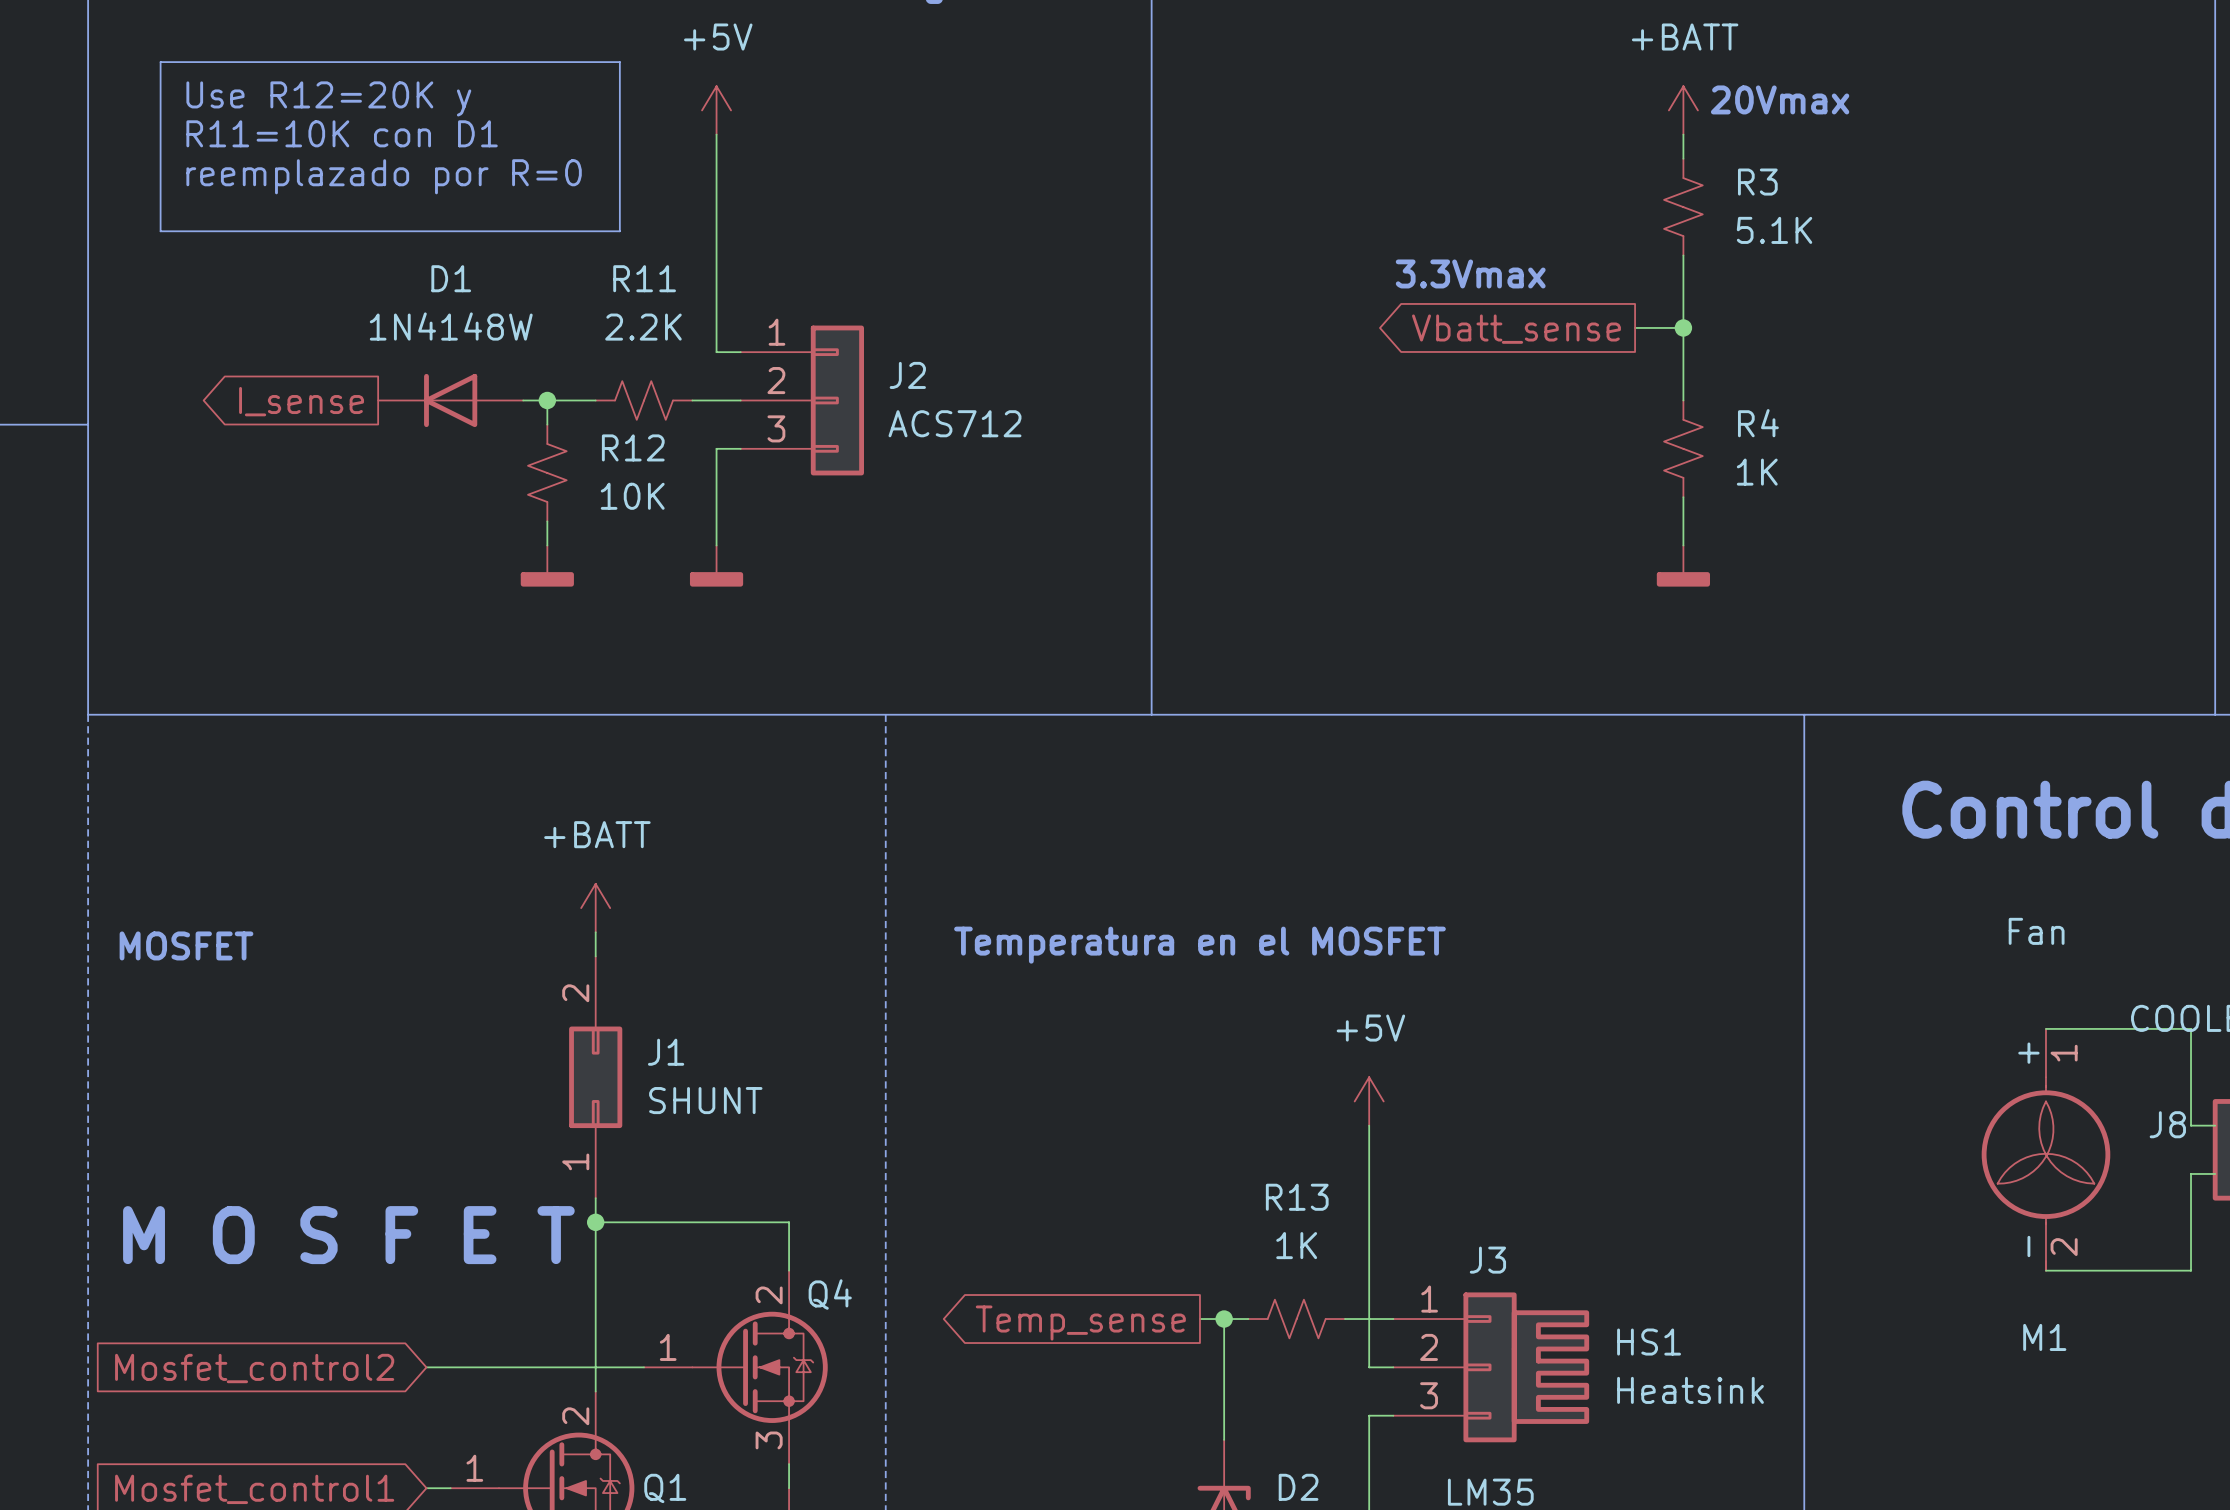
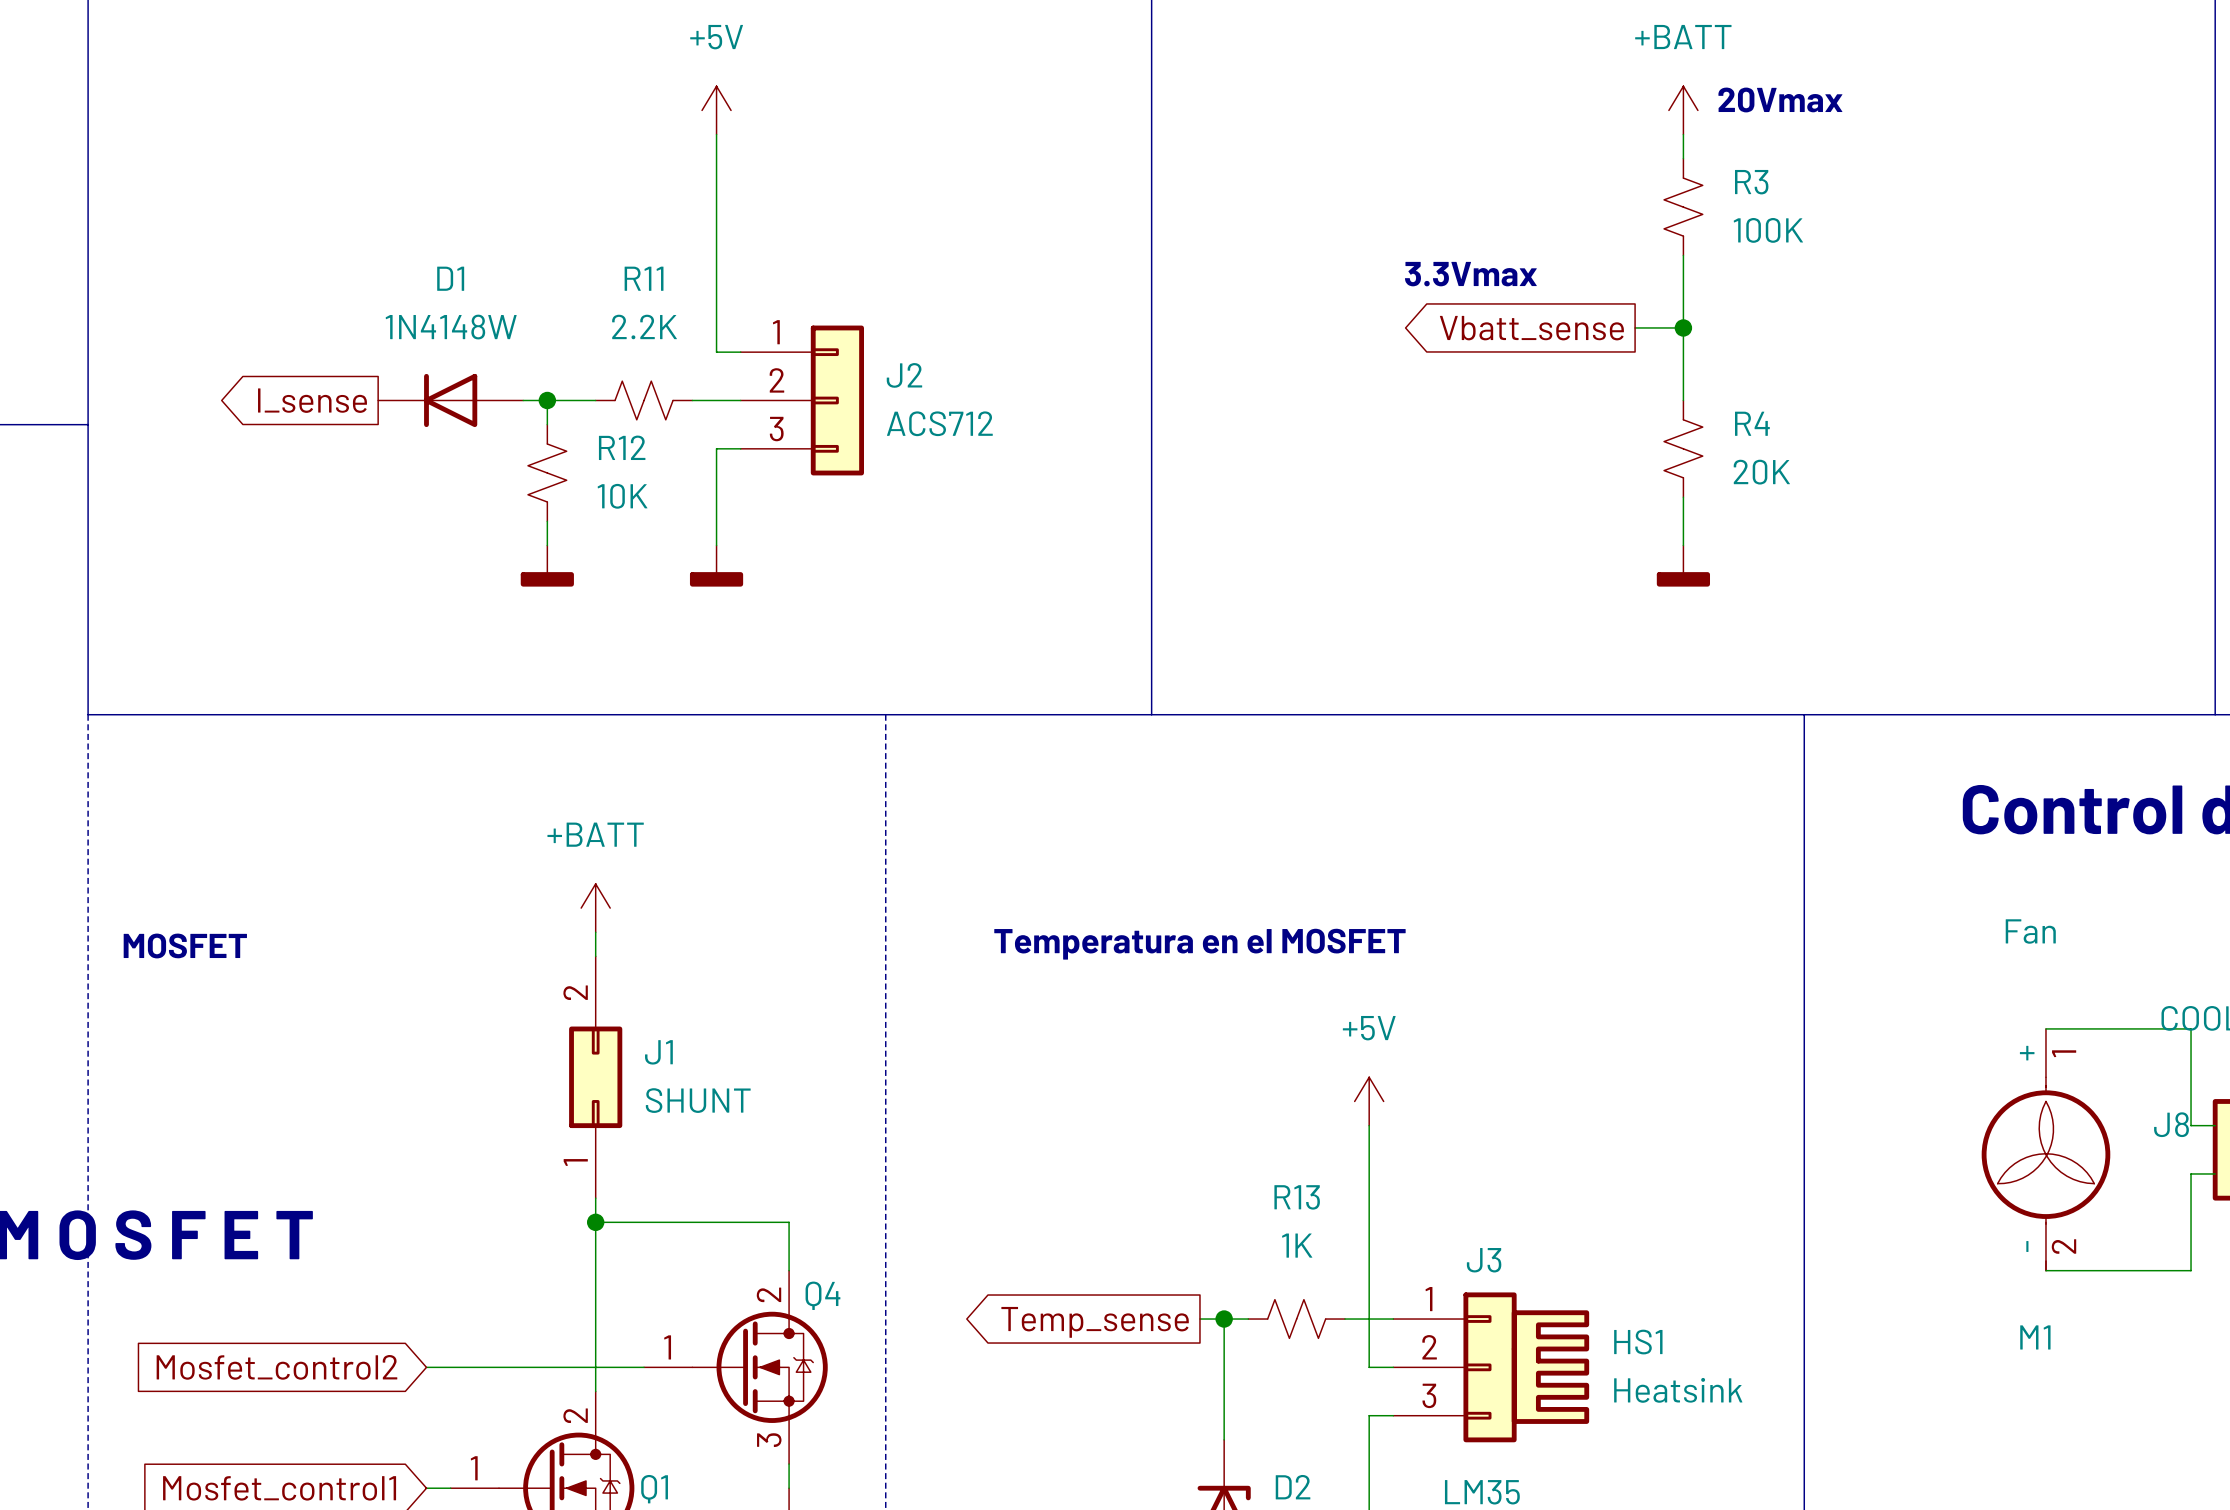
line: (160, 62) (619, 62) (619, 231) (160, 231) (160, 62) -> none
text: Use R12=20K y (328, 98) -> none
text: R11=10K con D1 (342, 133) -> none
text: reemplazado por R=0 (384, 176) -> none
R3 value: 5.1K (1774, 230) -> 100K (1768, 230)
R4 value: 1K (1757, 472) -> 20K (1761, 472)

